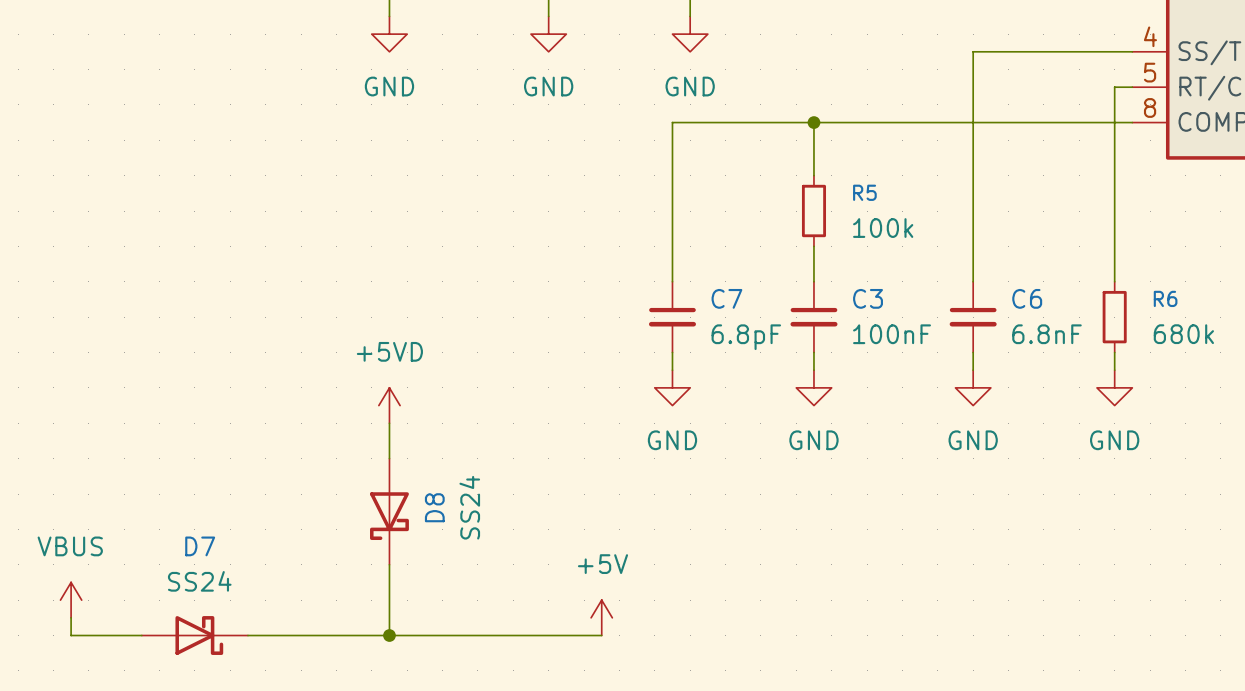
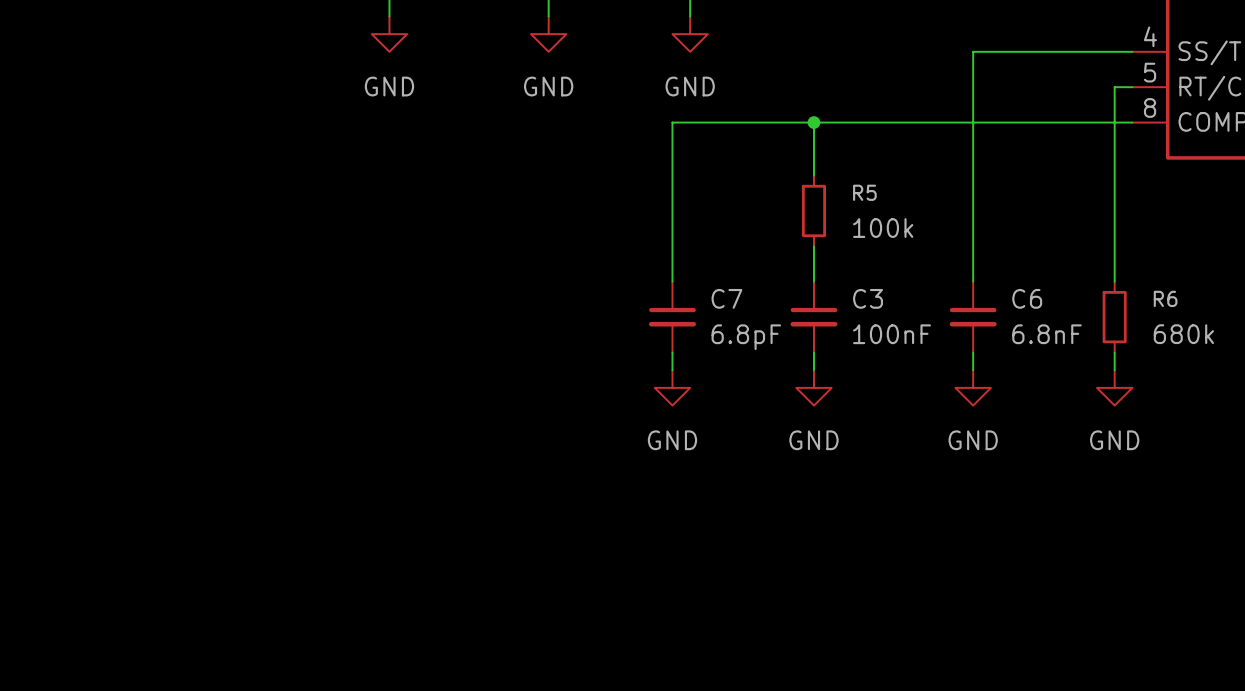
power symbol: +5VD (389, 405) -> none
wire: (389, 423) (389, 458) -> none
D8: SS24 (389, 511) -> none
wire: (389, 564) (389, 635) -> none
power symbol: VBUS (71, 600) -> none
wire: (71, 617) (71, 635) (141, 635) -> none
power symbol: +5V (601, 617) -> none
D7: SS24 (194, 635) -> none
wire: (247, 635) (601, 635) -> none
junction: (389, 635) -> none

